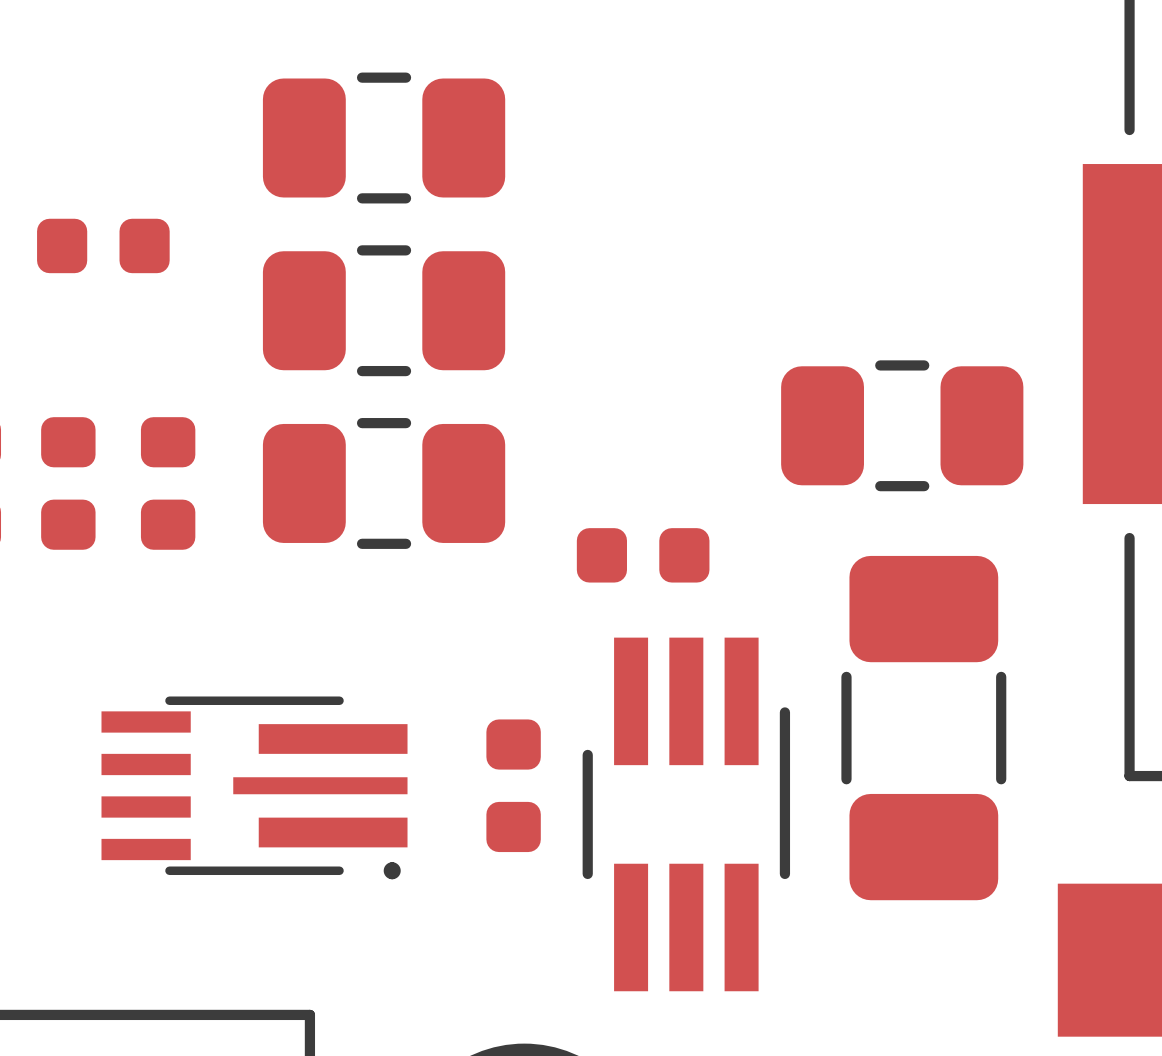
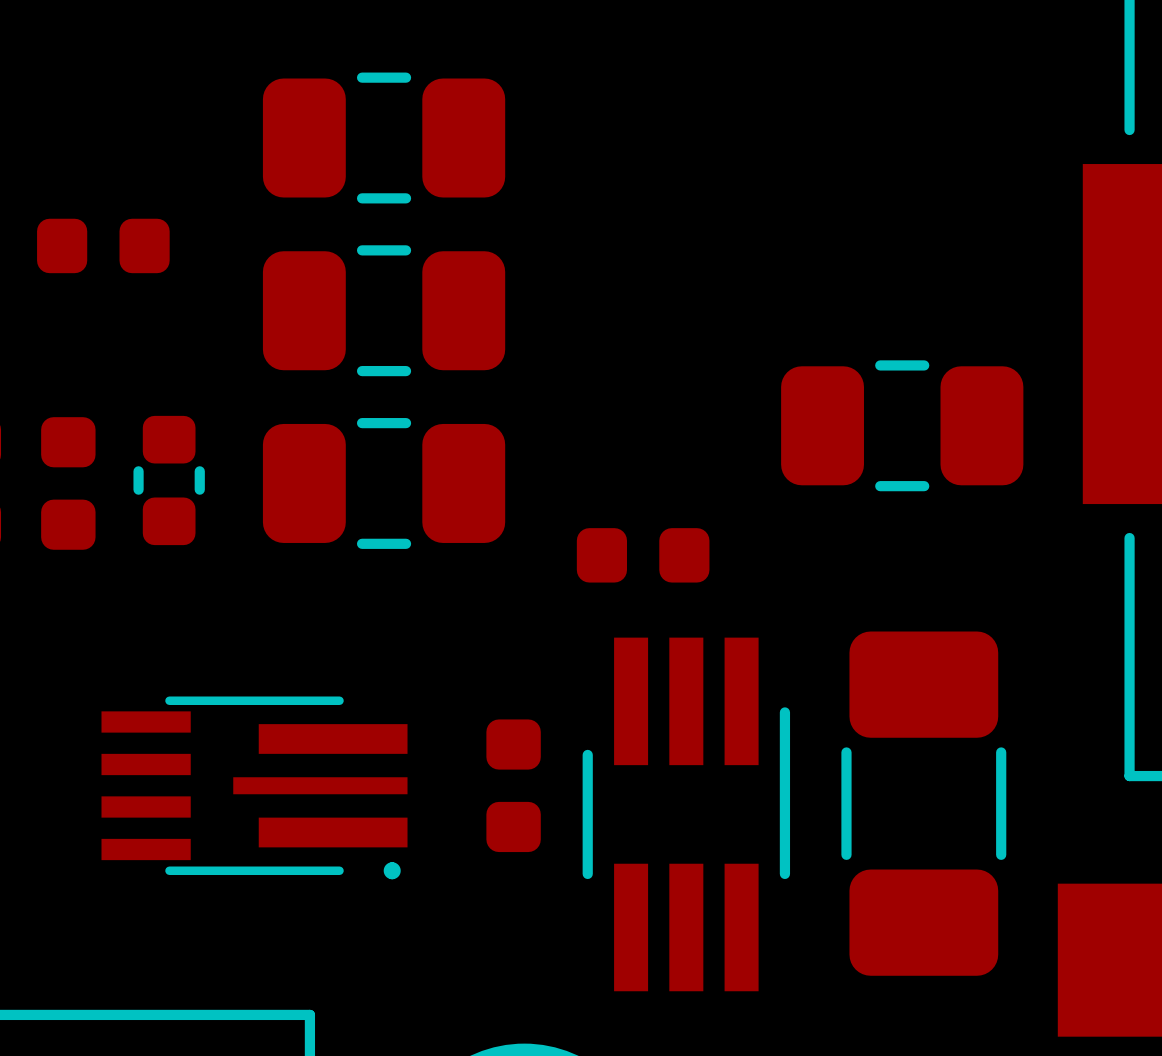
part footprint: [140, 417, 196, 550] -> [133, 415, 205, 546]
part position: (923, 728) -> (923, 803)

